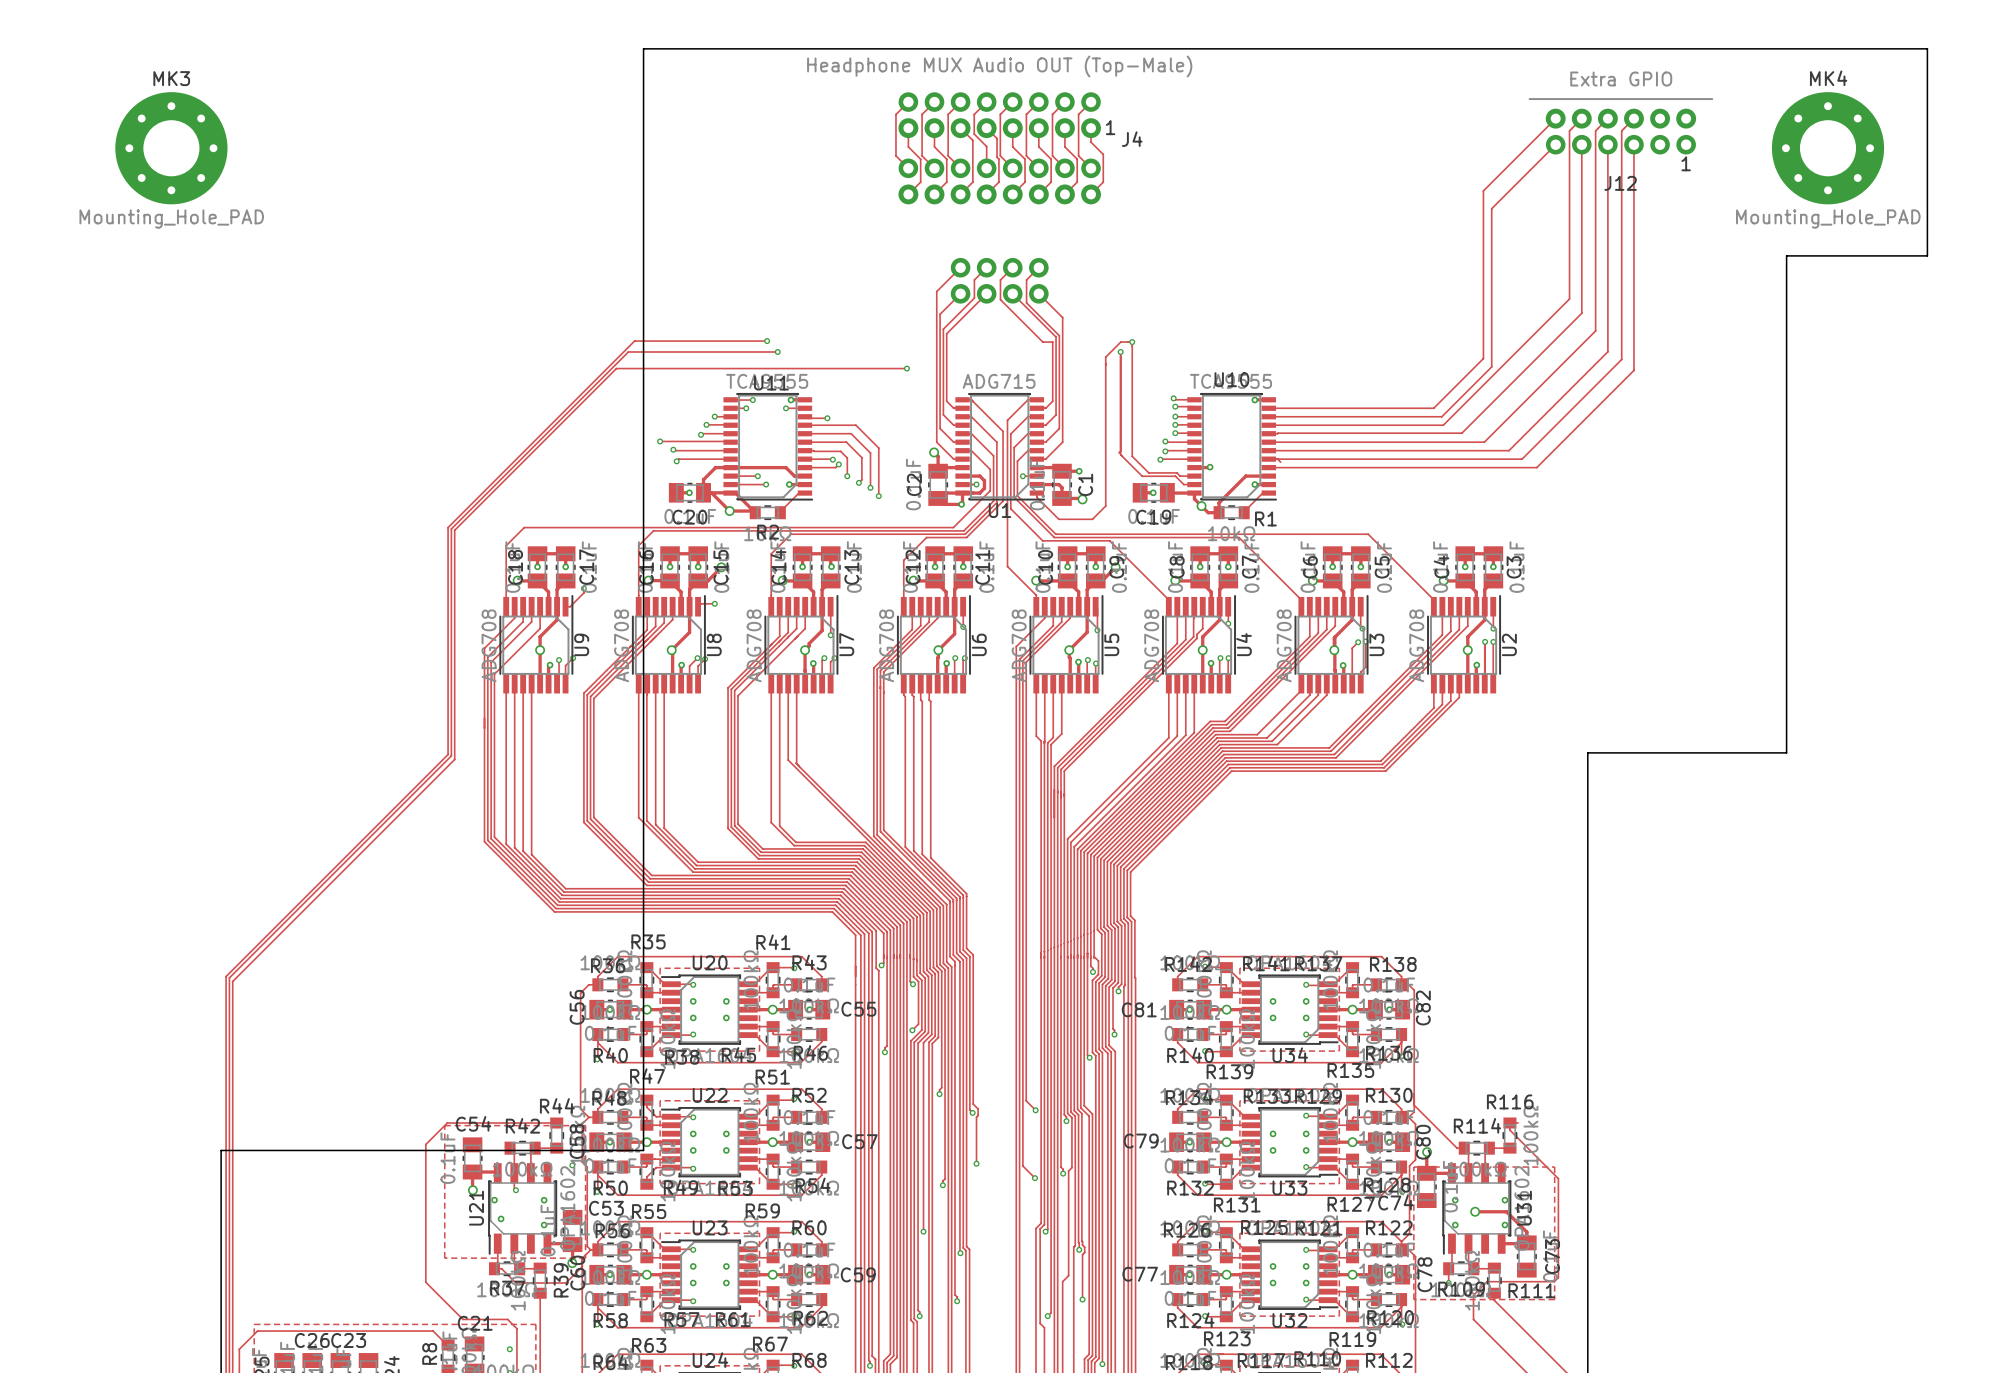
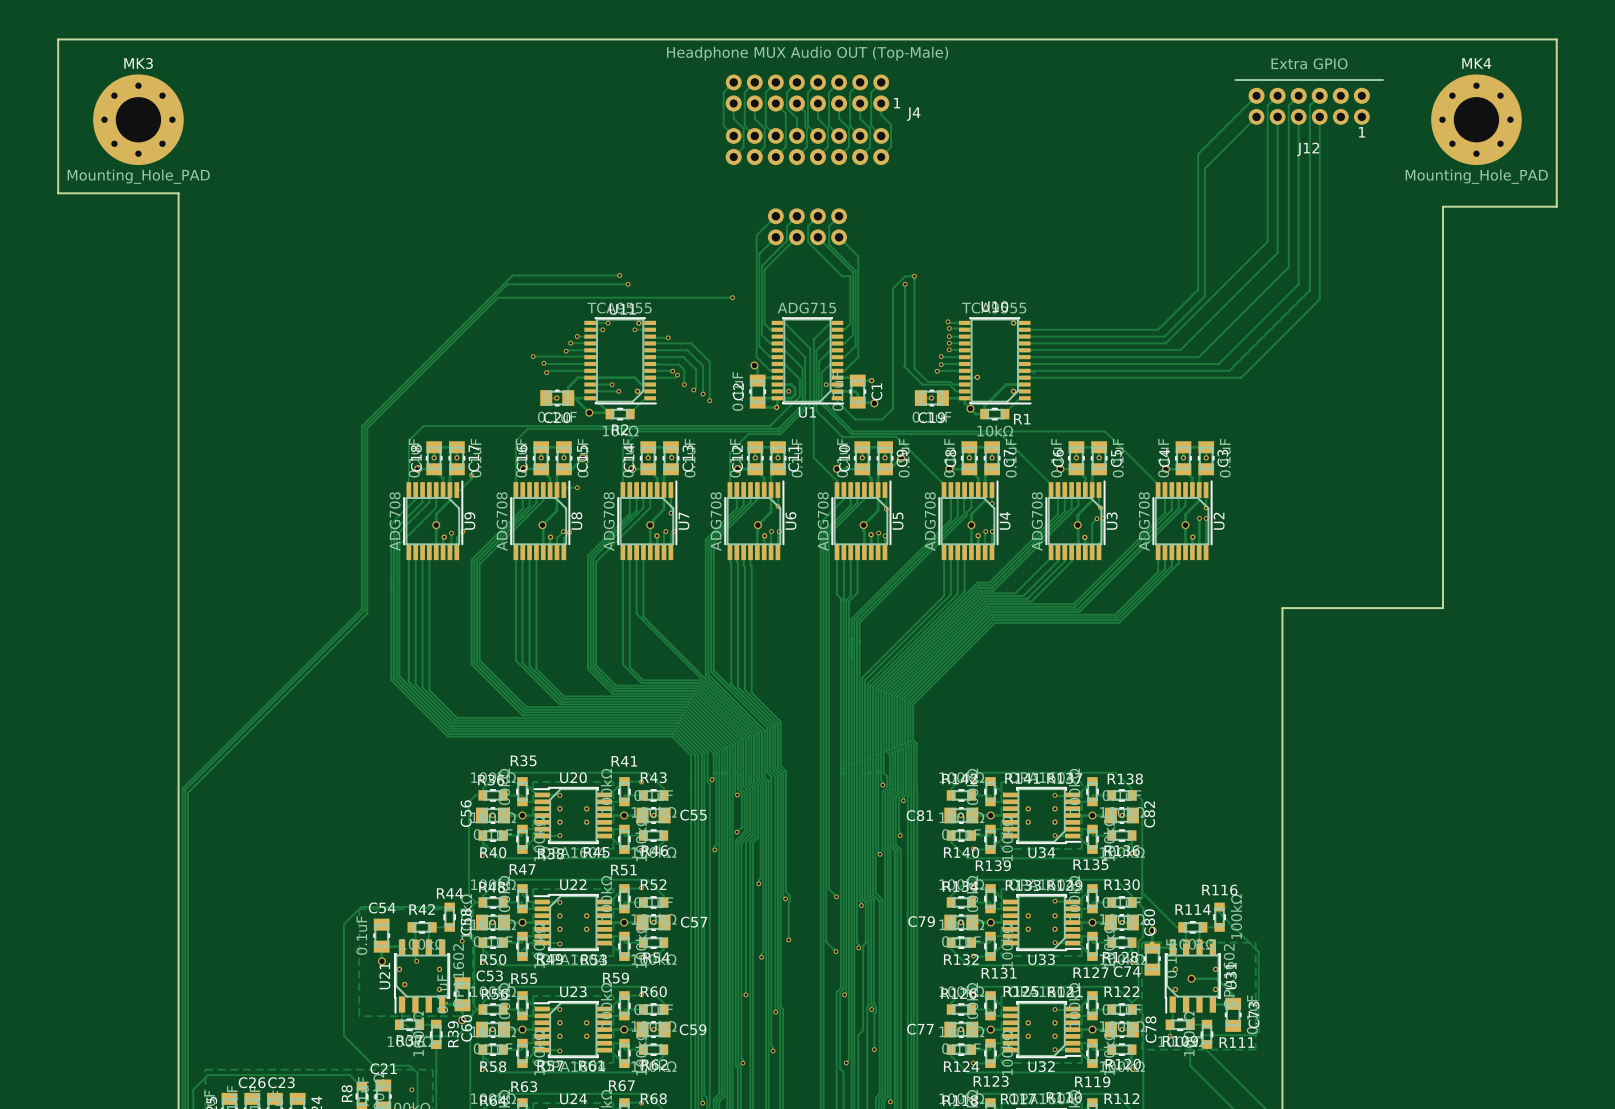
board edge: (643, 48) (643, 1150) (221, 1150) -> (519, 39) (58, 39) (58, 193) (178, 193) (178, 929)

